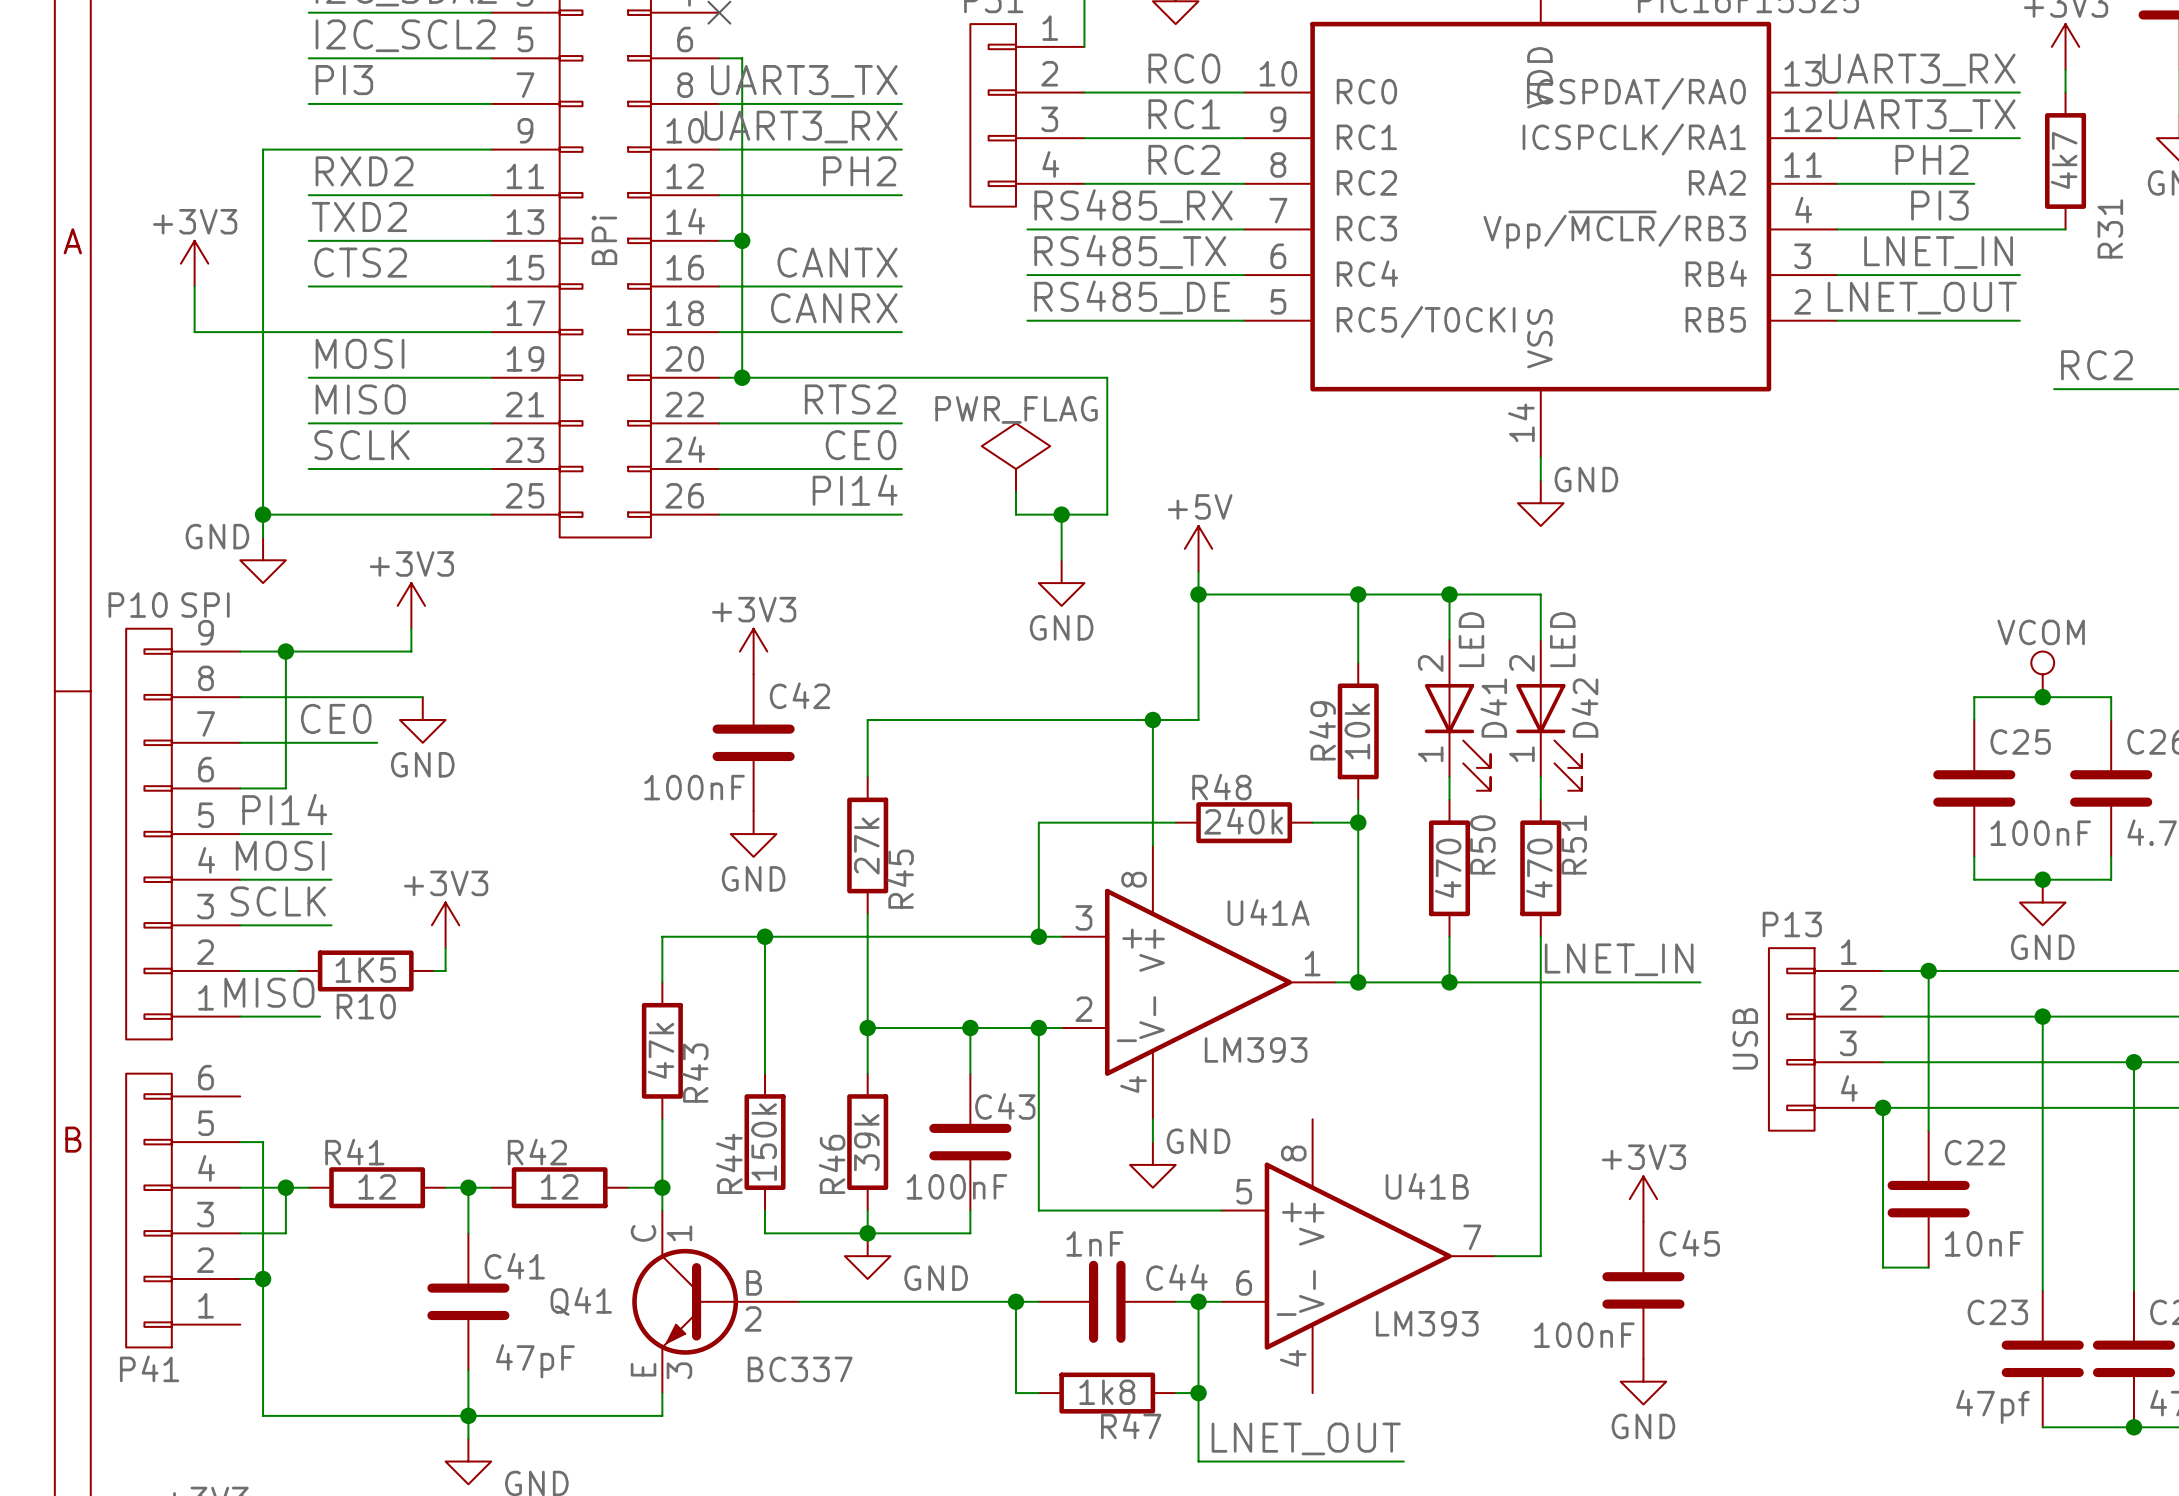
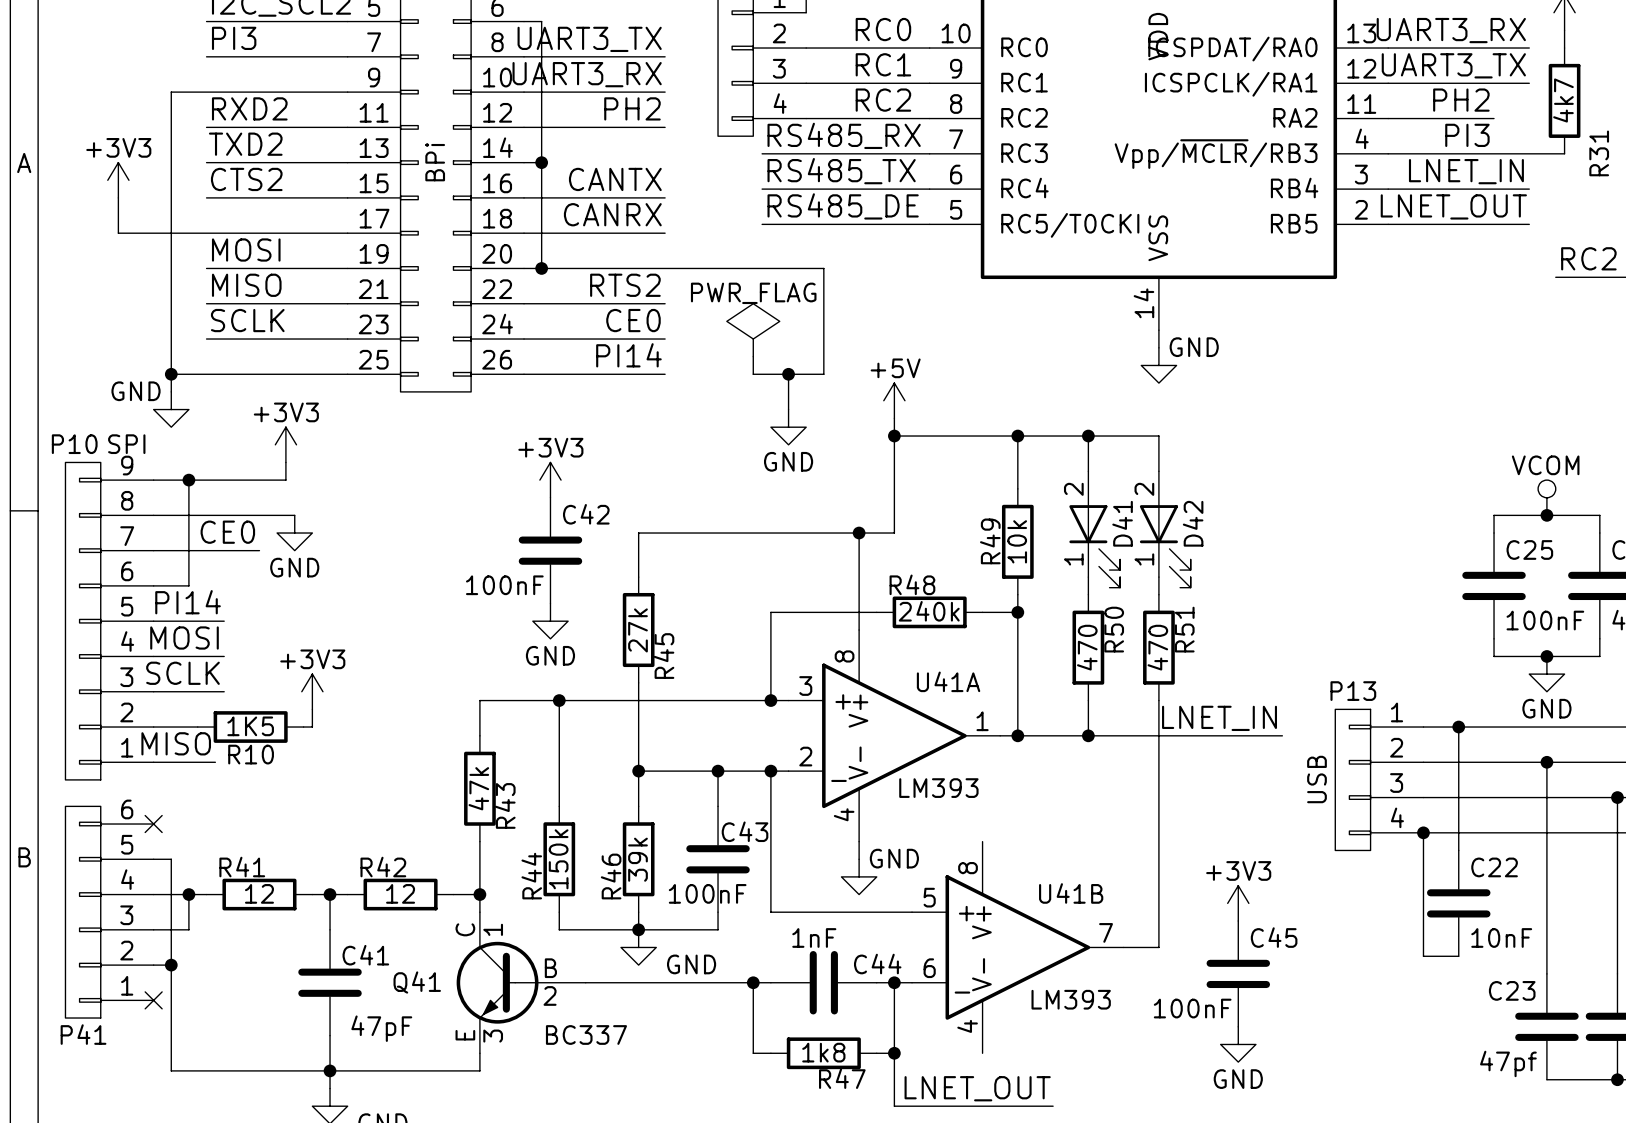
D41 value: LED (1471, 639) -> none
D42 value: LED (1562, 639) -> none
no-connect mark: none -> (153, 824)
no-connect mark: none -> (153, 1000)

